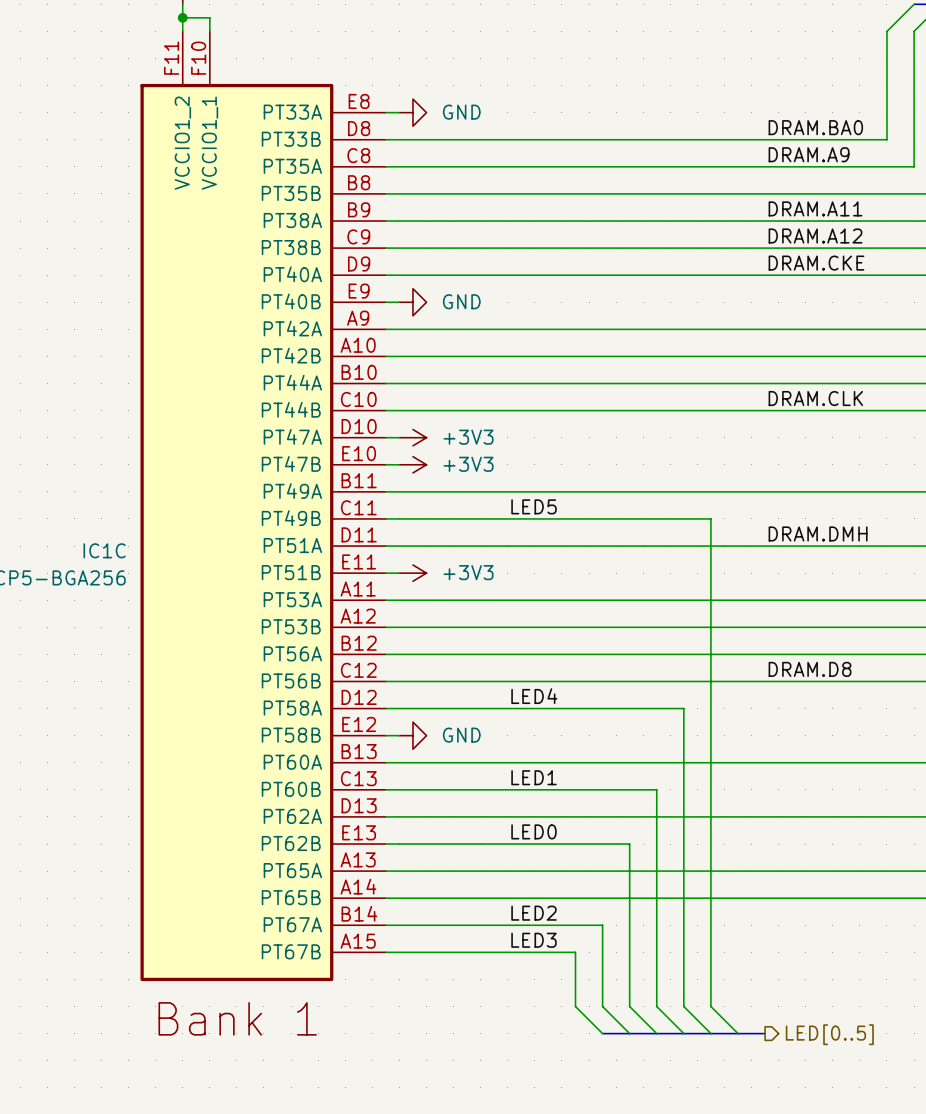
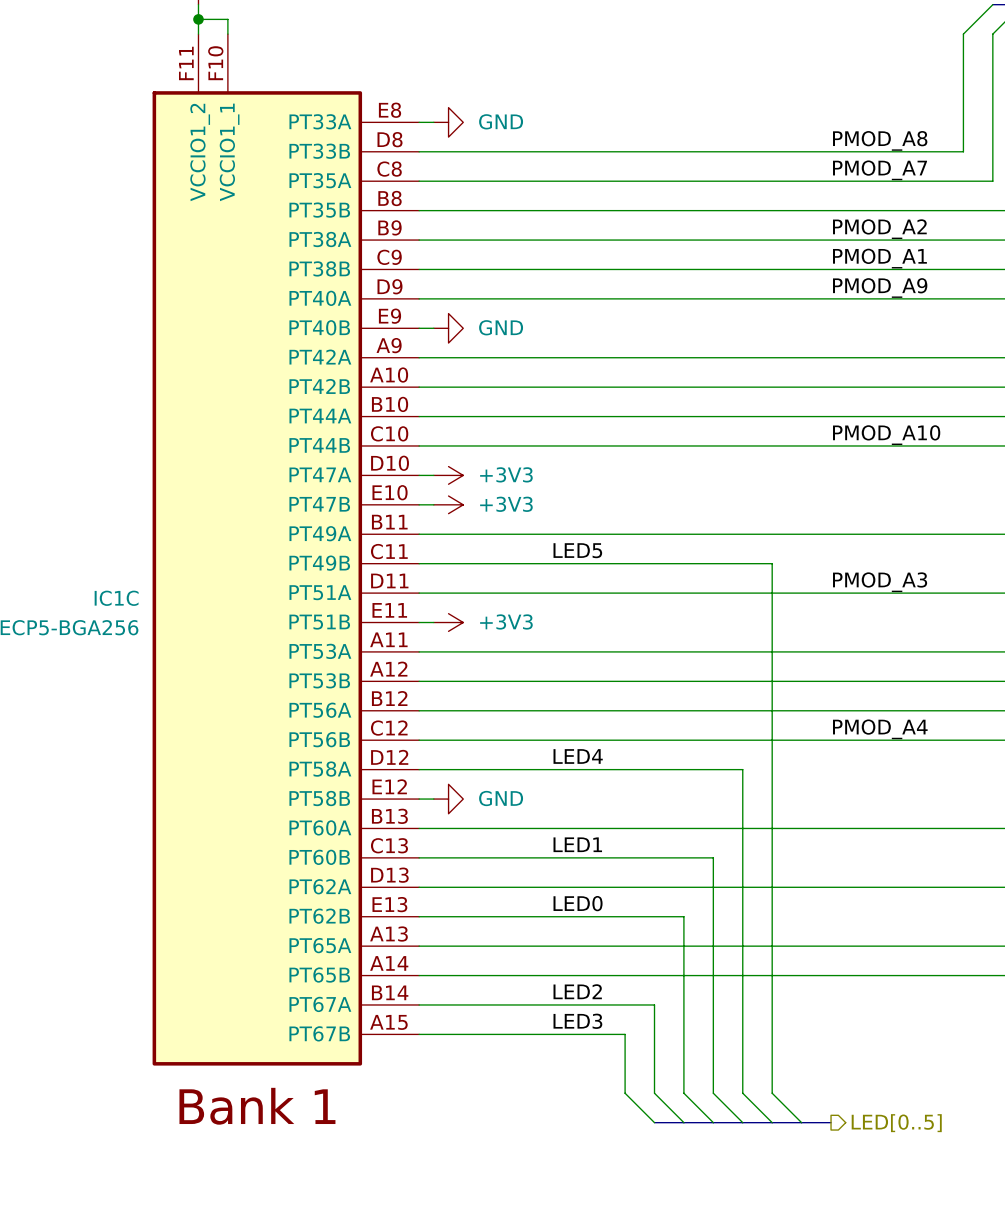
label: DRAM.BA0 (815, 127) -> PMOD_A8 (880, 140)
label: DRAM.A9 (809, 154) -> PMOD_A7 (880, 170)
label: DRAM.A11 (815, 208) -> PMOD_A2 (879, 229)
label: DRAM.A12 (815, 236) -> PMOD_A1 (879, 258)
label: DRAM.CKE (816, 263) -> PMOD_A9 (880, 288)
label: DRAM.CLK (815, 398) -> PMOD_A10 (886, 435)
label: DRAM.DMH (818, 533) -> PMOD_A3 (880, 582)
label: DRAM.D8 (810, 669) -> PMOD_A4 (880, 729)

